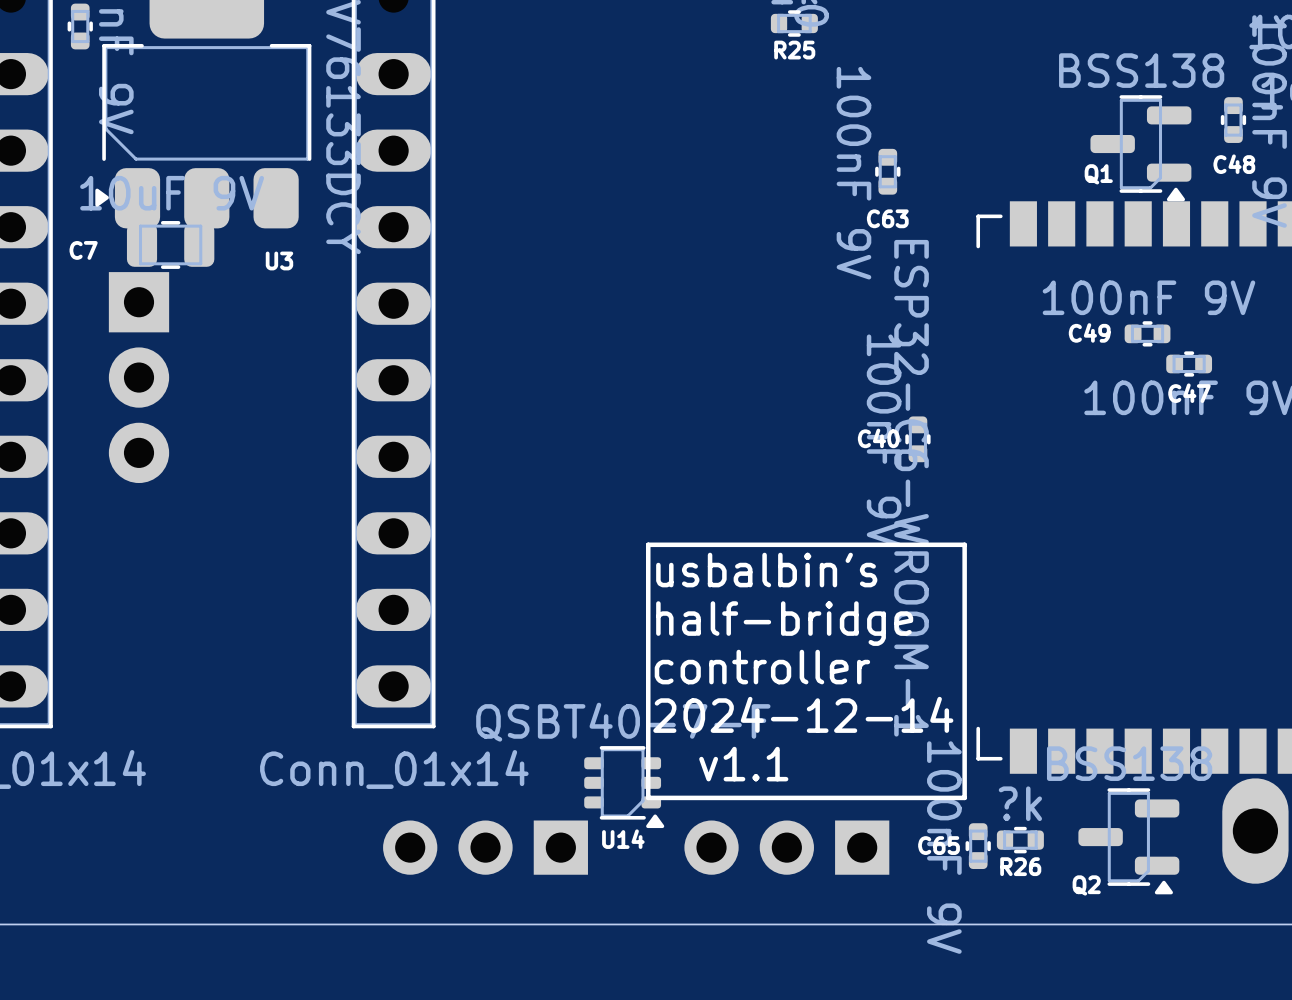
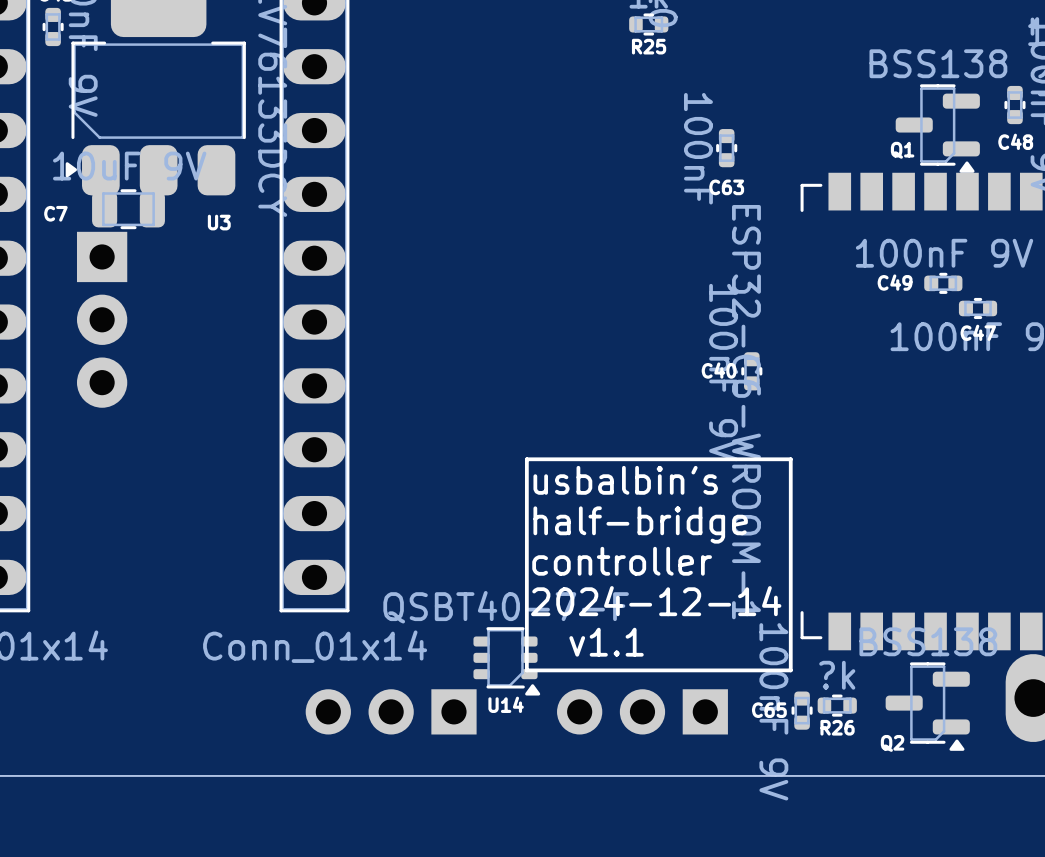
C63 value: 100nF 9V (853, 173) -> 100nF (698, 148)

